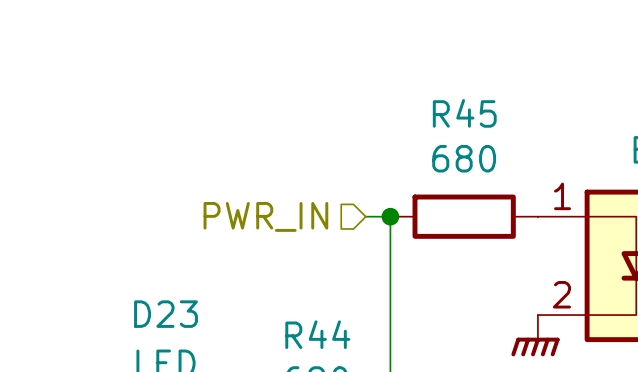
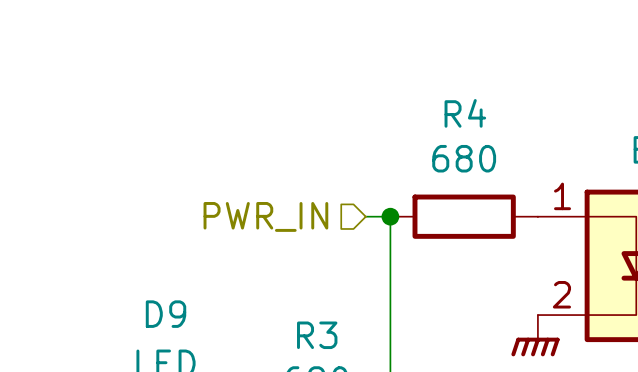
R45 name: R45 (464, 113) -> R4 (465, 113)
D23 name: D23 (166, 314) -> D9 (166, 314)
R44 name: R44 (317, 334) -> R3 (317, 335)

